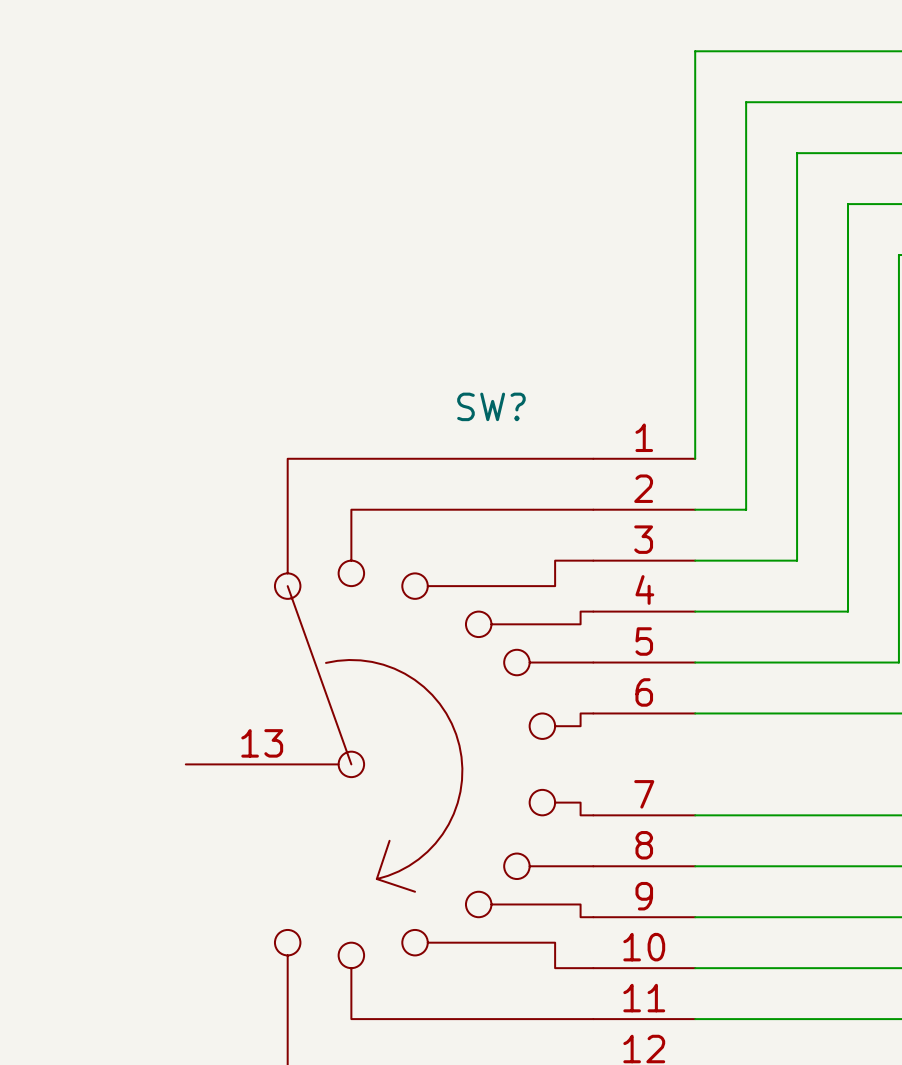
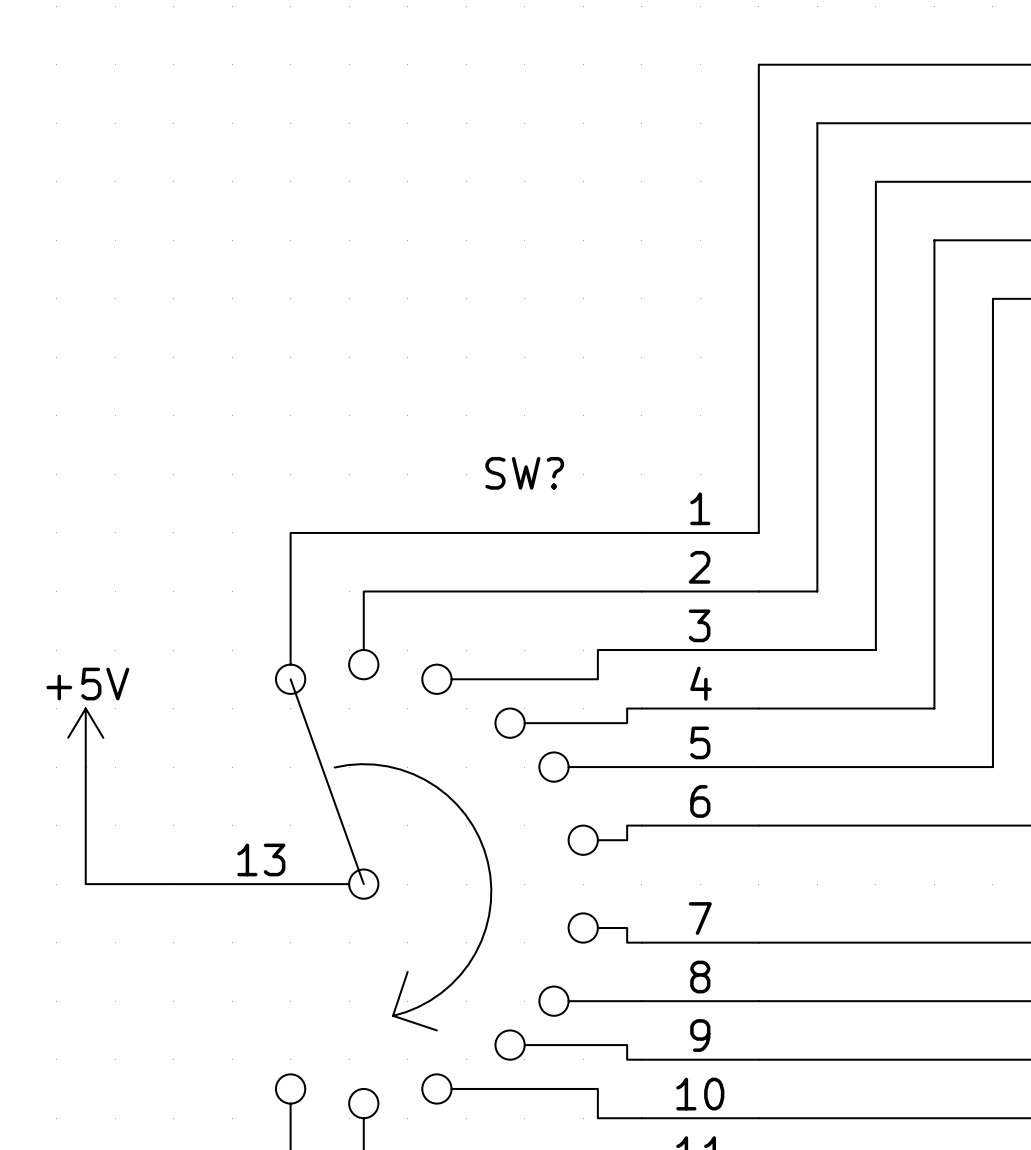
power symbol: none -> +5V (85, 737)
wire: none -> (85, 767) (85, 884) (173, 884)

